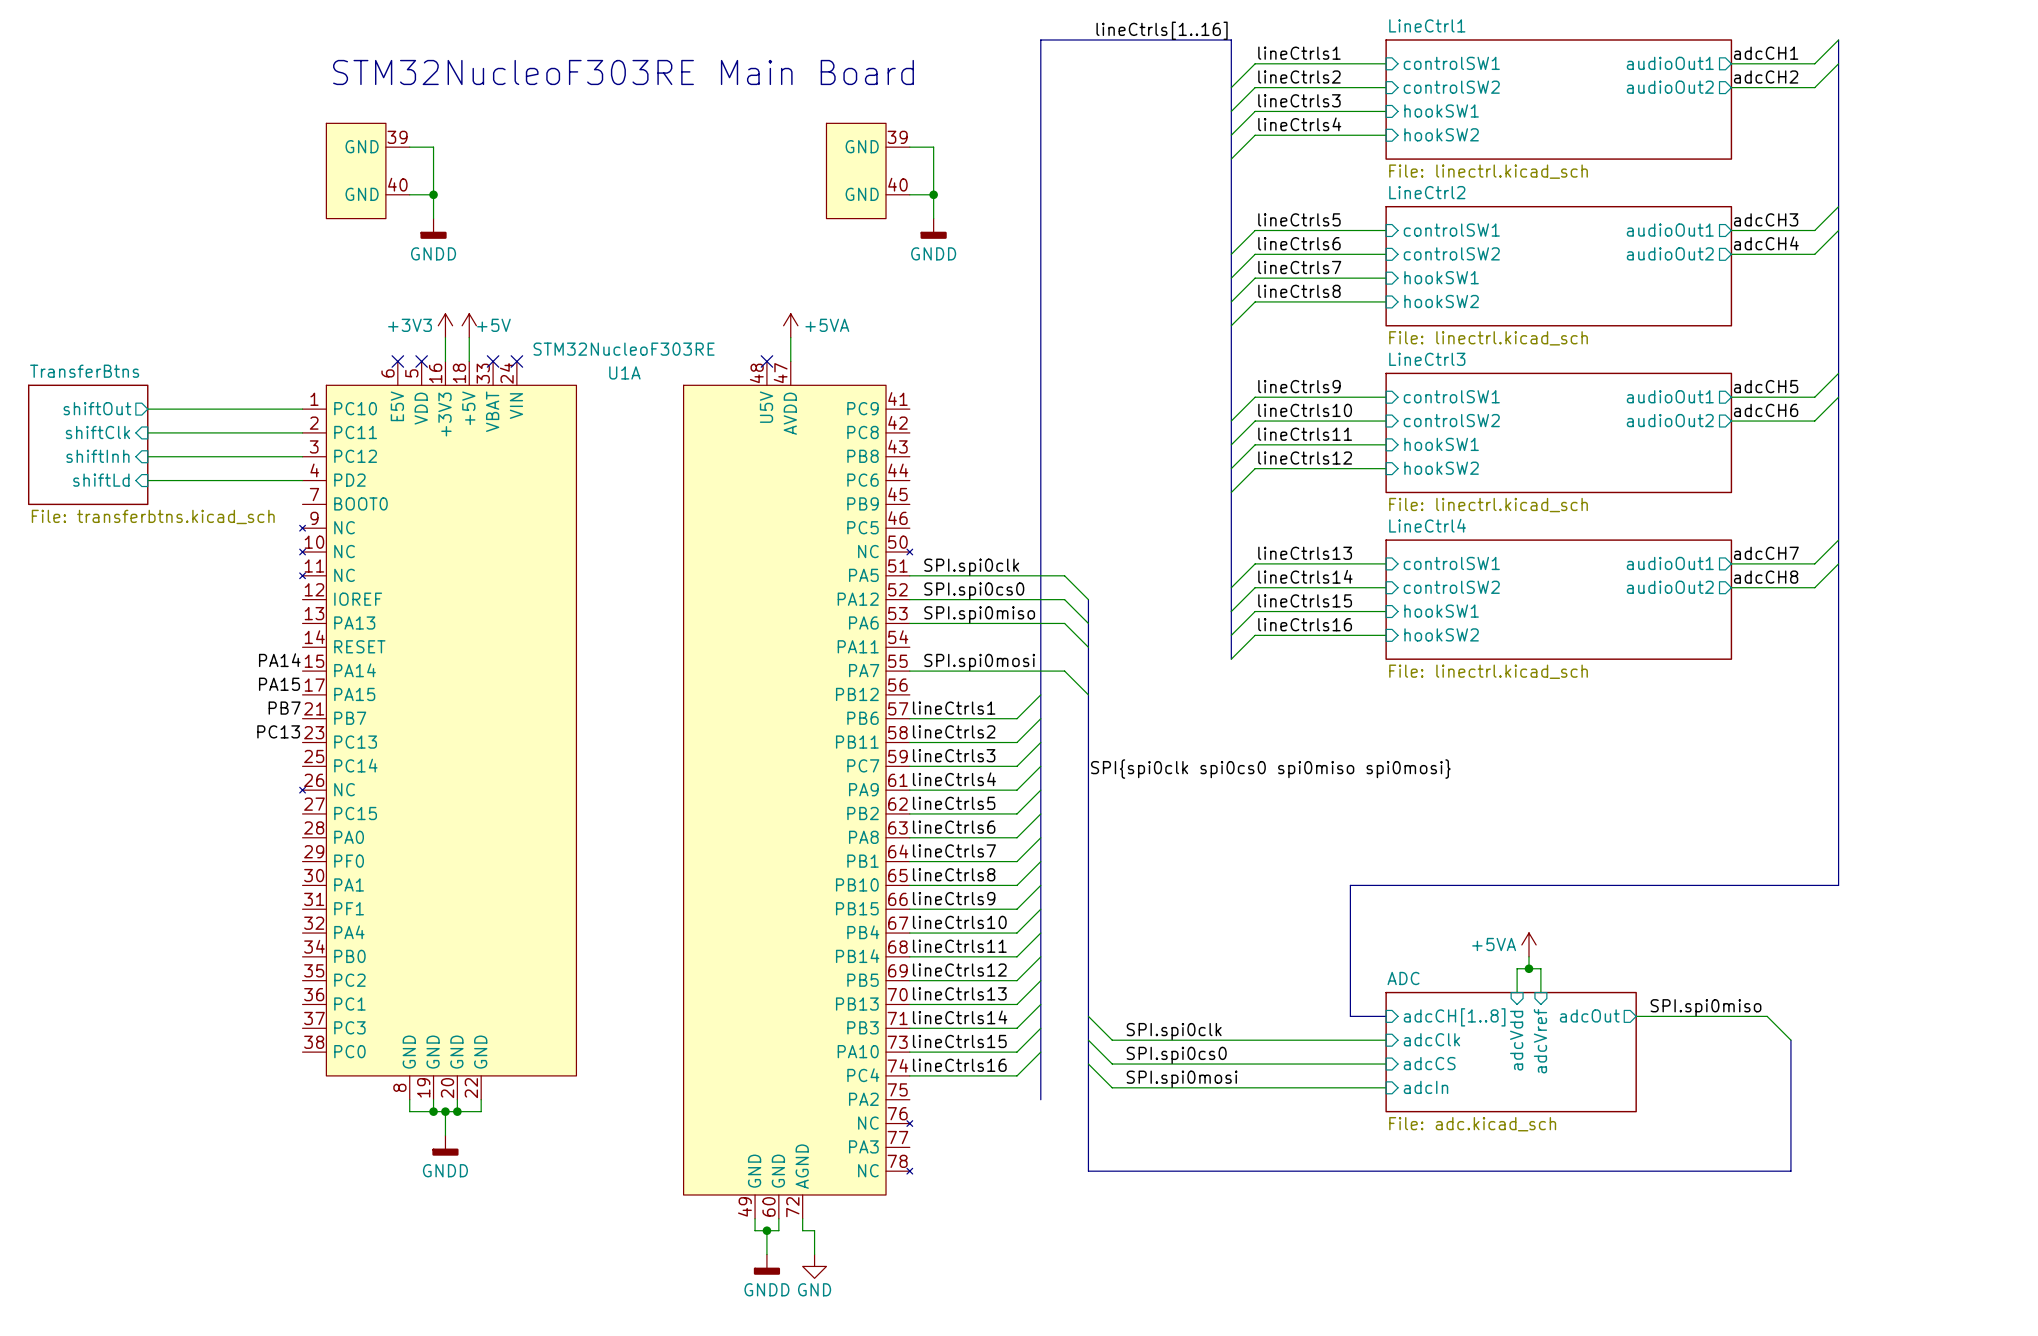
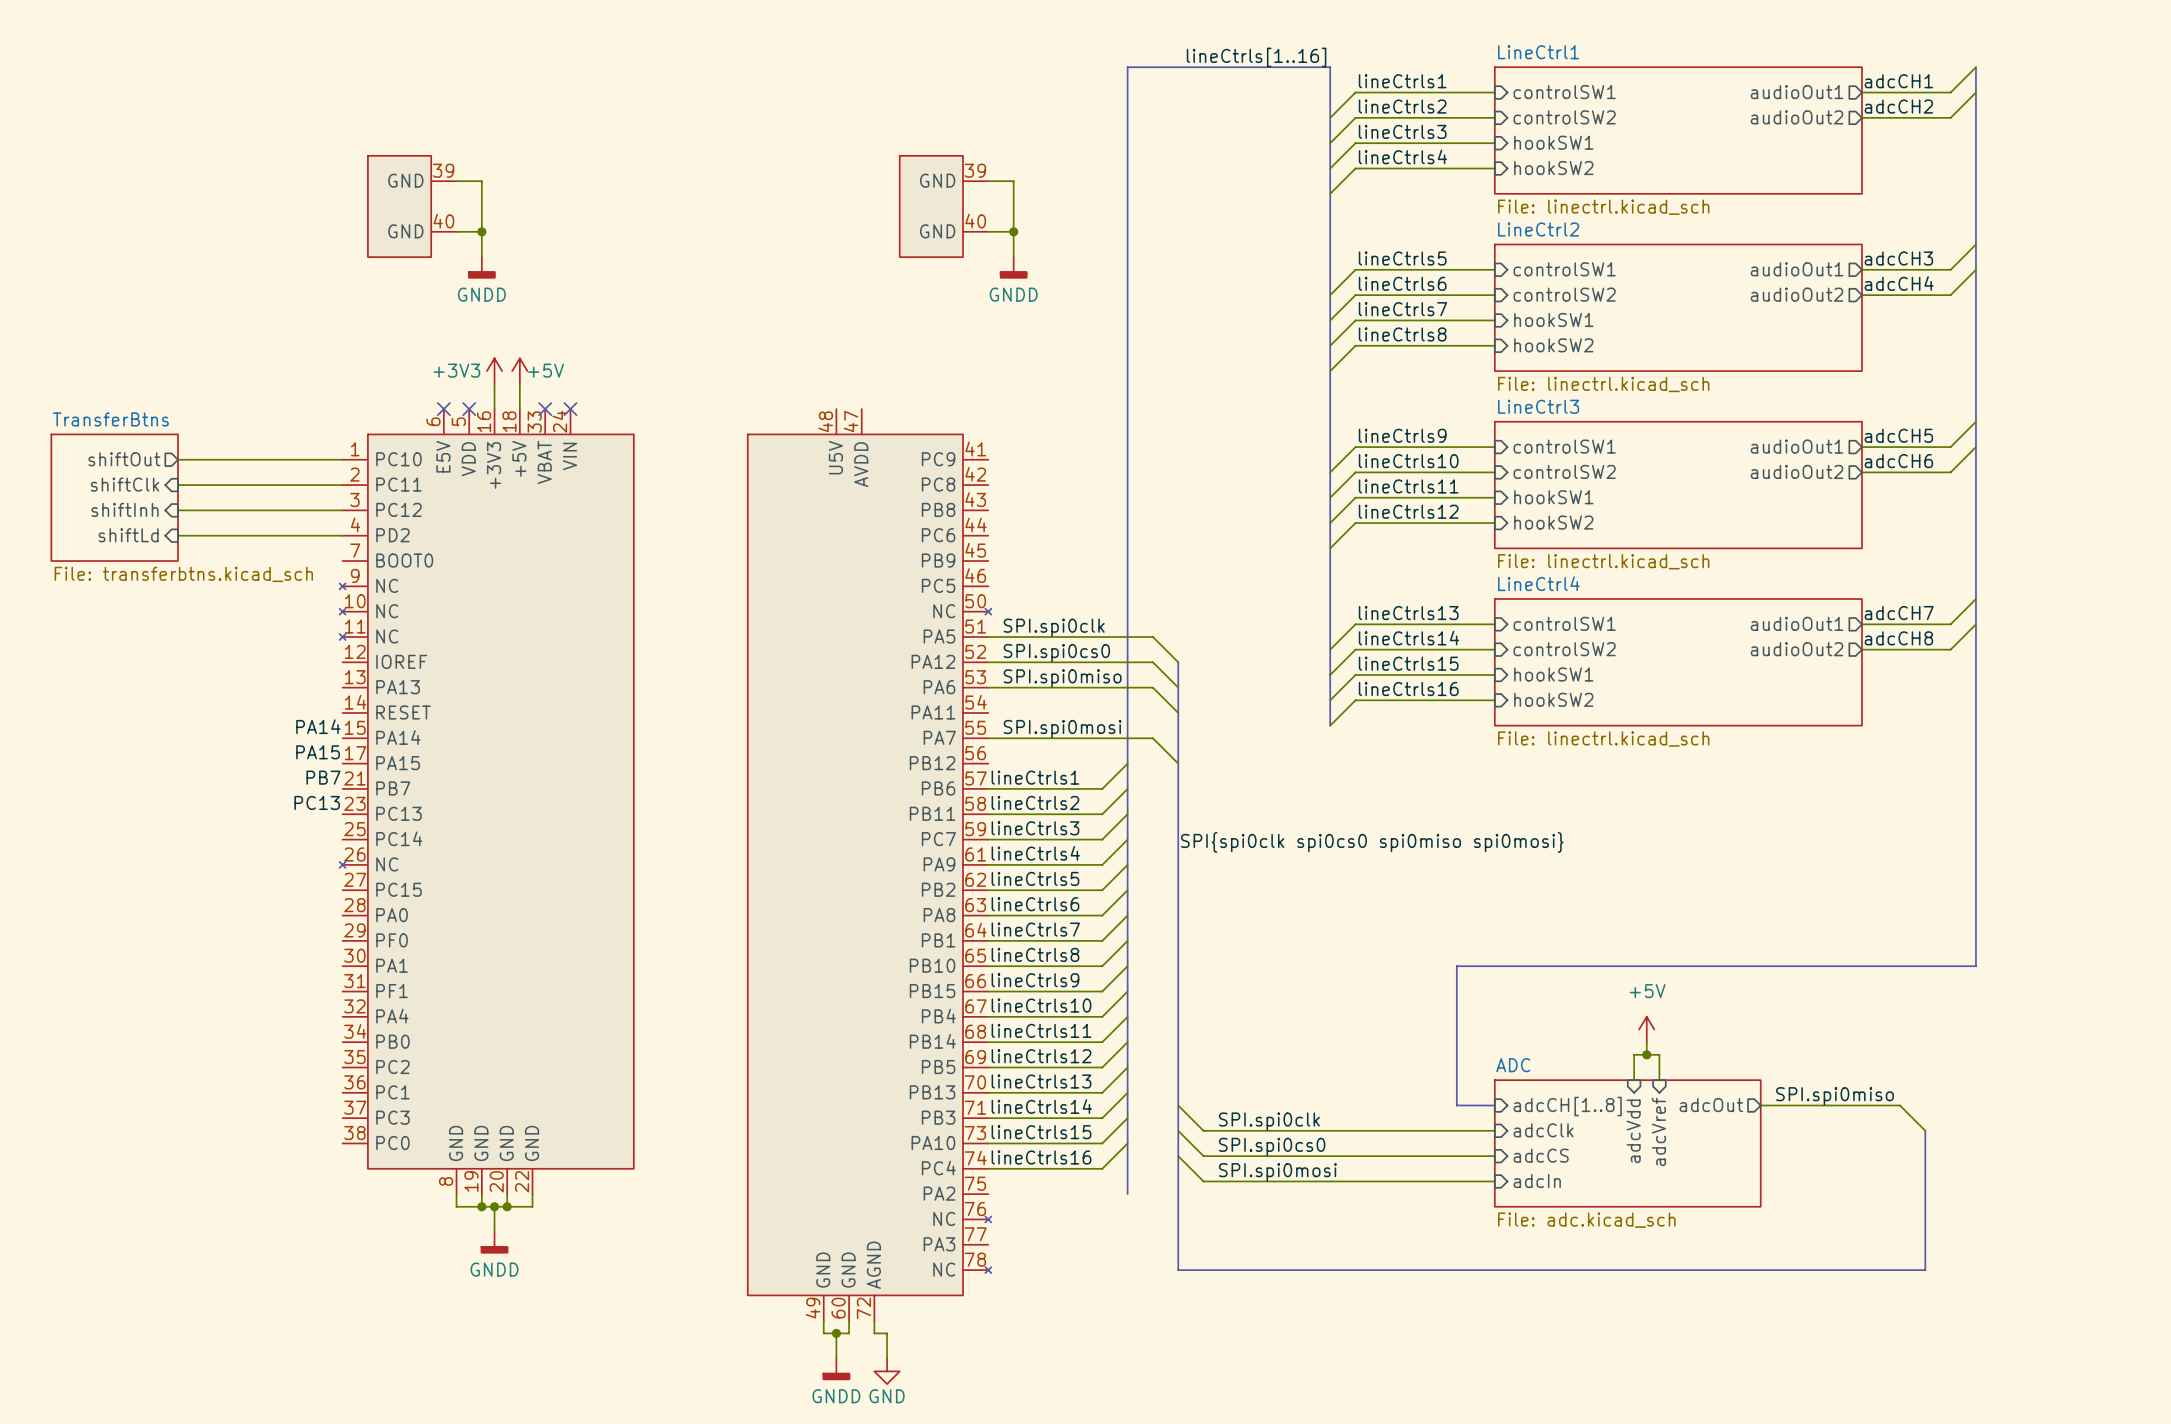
text: STM32NucleoF303RE Main Board (623, 72) -> none
power symbol: +5VA (790, 325) -> none
wire: (790, 337) (790, 361) -> none
U1A value: STM32NucleoF303RE (624, 349) -> none
no-connect mark: (766, 361) -> none
U1A name: U1A (624, 372) -> none
power symbol: +5VA (1529, 944) -> +5V (1646, 1029)

